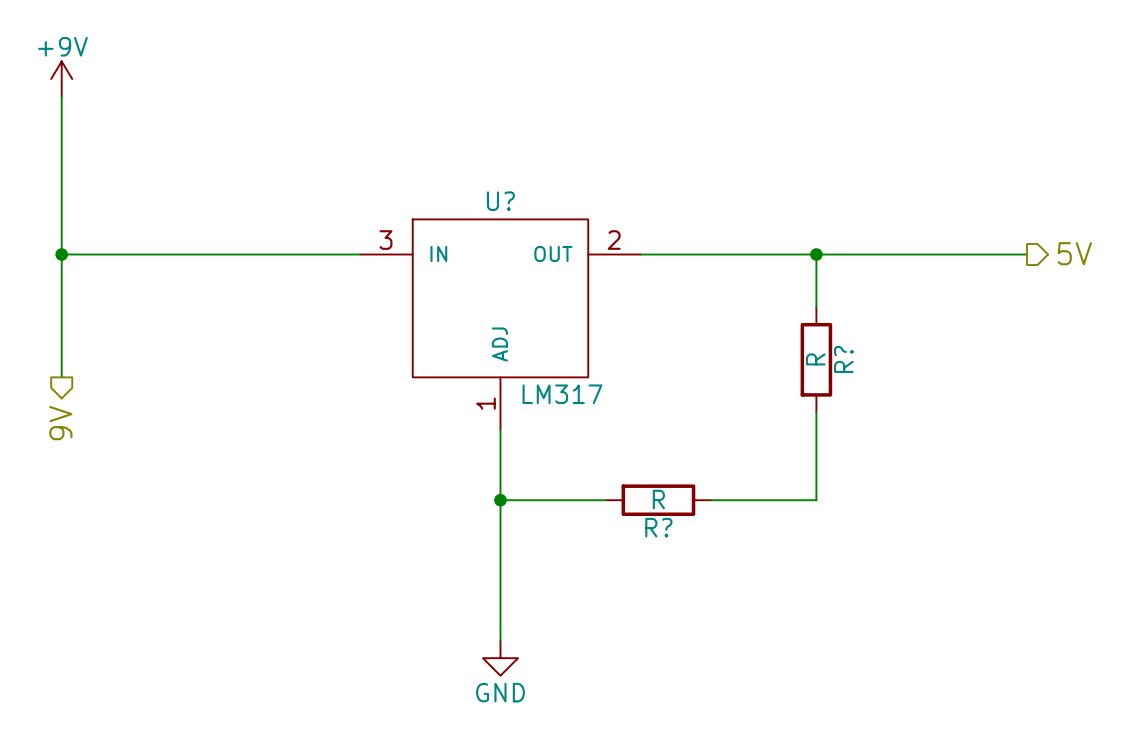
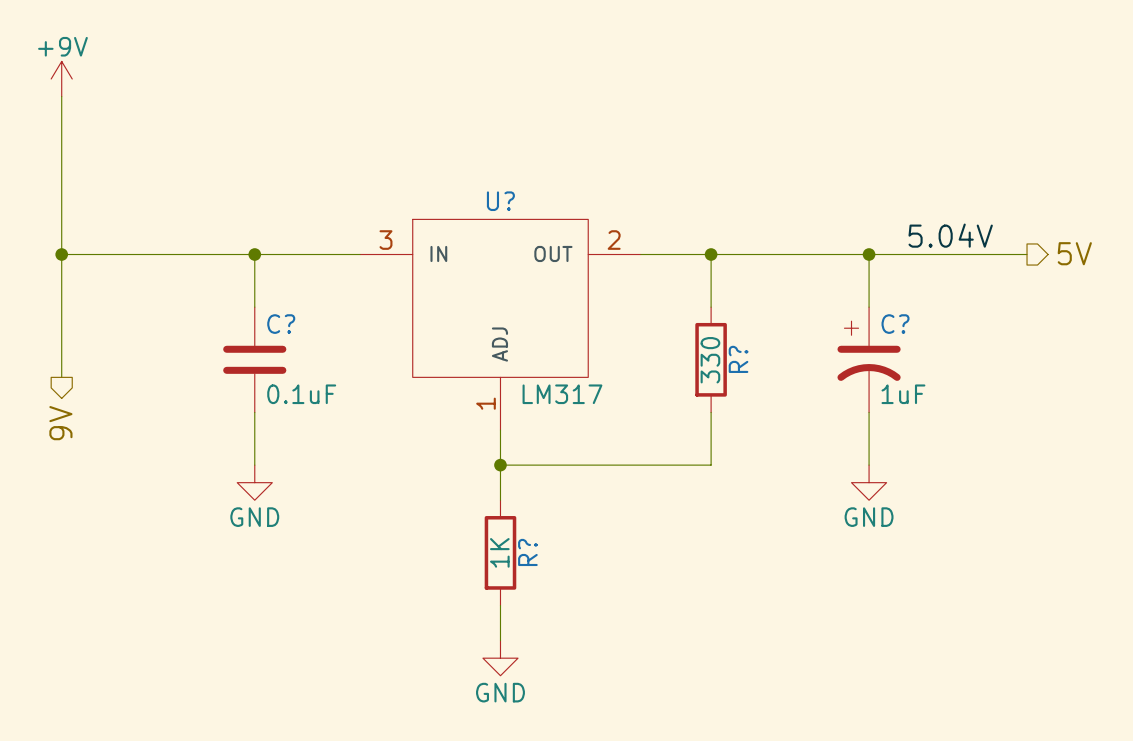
label: none -> 5.04V (950, 235)
wire: none -> (254, 254) (254, 307)
junction: none -> (254, 254)
wire: none -> (711, 254) (711, 307)
junction: none -> (711, 254)
wire: (816, 254) (816, 307) -> (869, 254) (869, 307)
junction: (816, 254) -> none
junction: none -> (869, 254)
C?: none -> 0.1uF (254, 359)
R?: none -> 330 (711, 359)
R?: R (816, 359) -> none
C?: none -> 1uF (869, 359)
wire: none -> (254, 412) (254, 465)
wire: none -> (711, 412) (711, 465) (500, 465)
wire: (816, 412) (816, 500) (711, 500) -> none
wire: none -> (869, 412) (869, 465)
power symbol: none -> GND (254, 482)
power symbol: none -> GND (869, 482)
junction position: (500, 500) -> (500, 465)
wire: (605, 500) (500, 500) (500, 605) -> none
R?: R (658, 500) -> none
R?: none -> 1K (500, 552)

